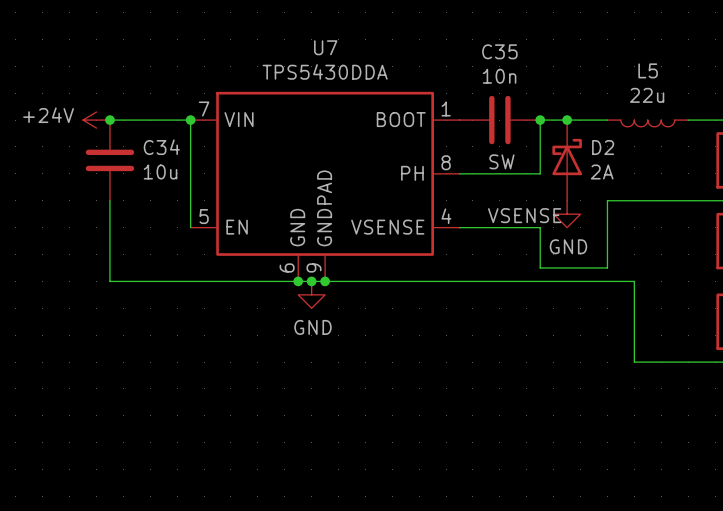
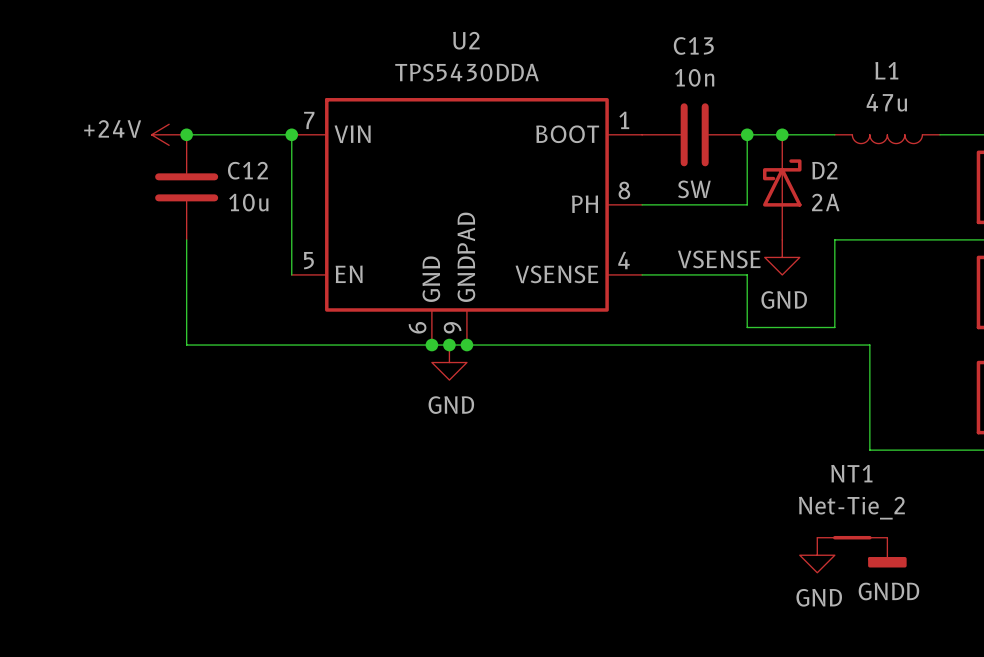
U7 name: U7 (325, 47) -> U2 (466, 40)
C35 name: C35 (499, 51) -> C13 (693, 45)
L5 name: L5 (648, 70) -> L1 (886, 70)
L5 value: 22u (647, 95) -> 47u (886, 102)
C34 name: C34 (161, 147) -> C12 (247, 170)
NT1: none -> Net-Tie_2 (852, 537)
power symbol: none -> GNDD (887, 552)
power symbol: none -> GND (817, 555)

